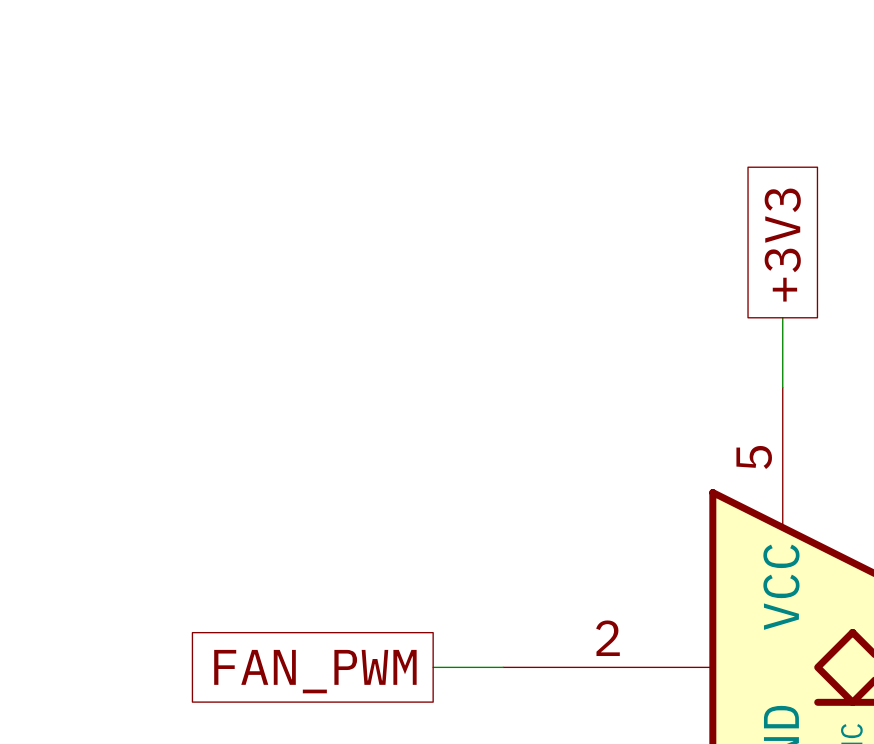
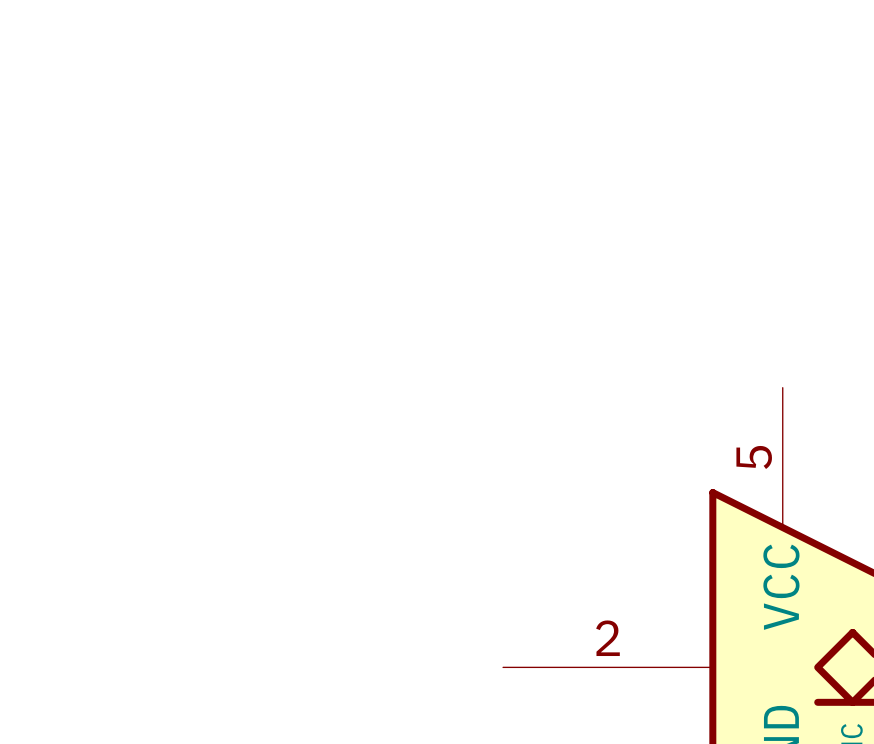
global label: +3V3 (782, 245) -> none
wire: (782, 317) (782, 387) -> none
wire: (433, 667) (503, 667) -> none
global label: FAN_PWM (315, 671) -> none

